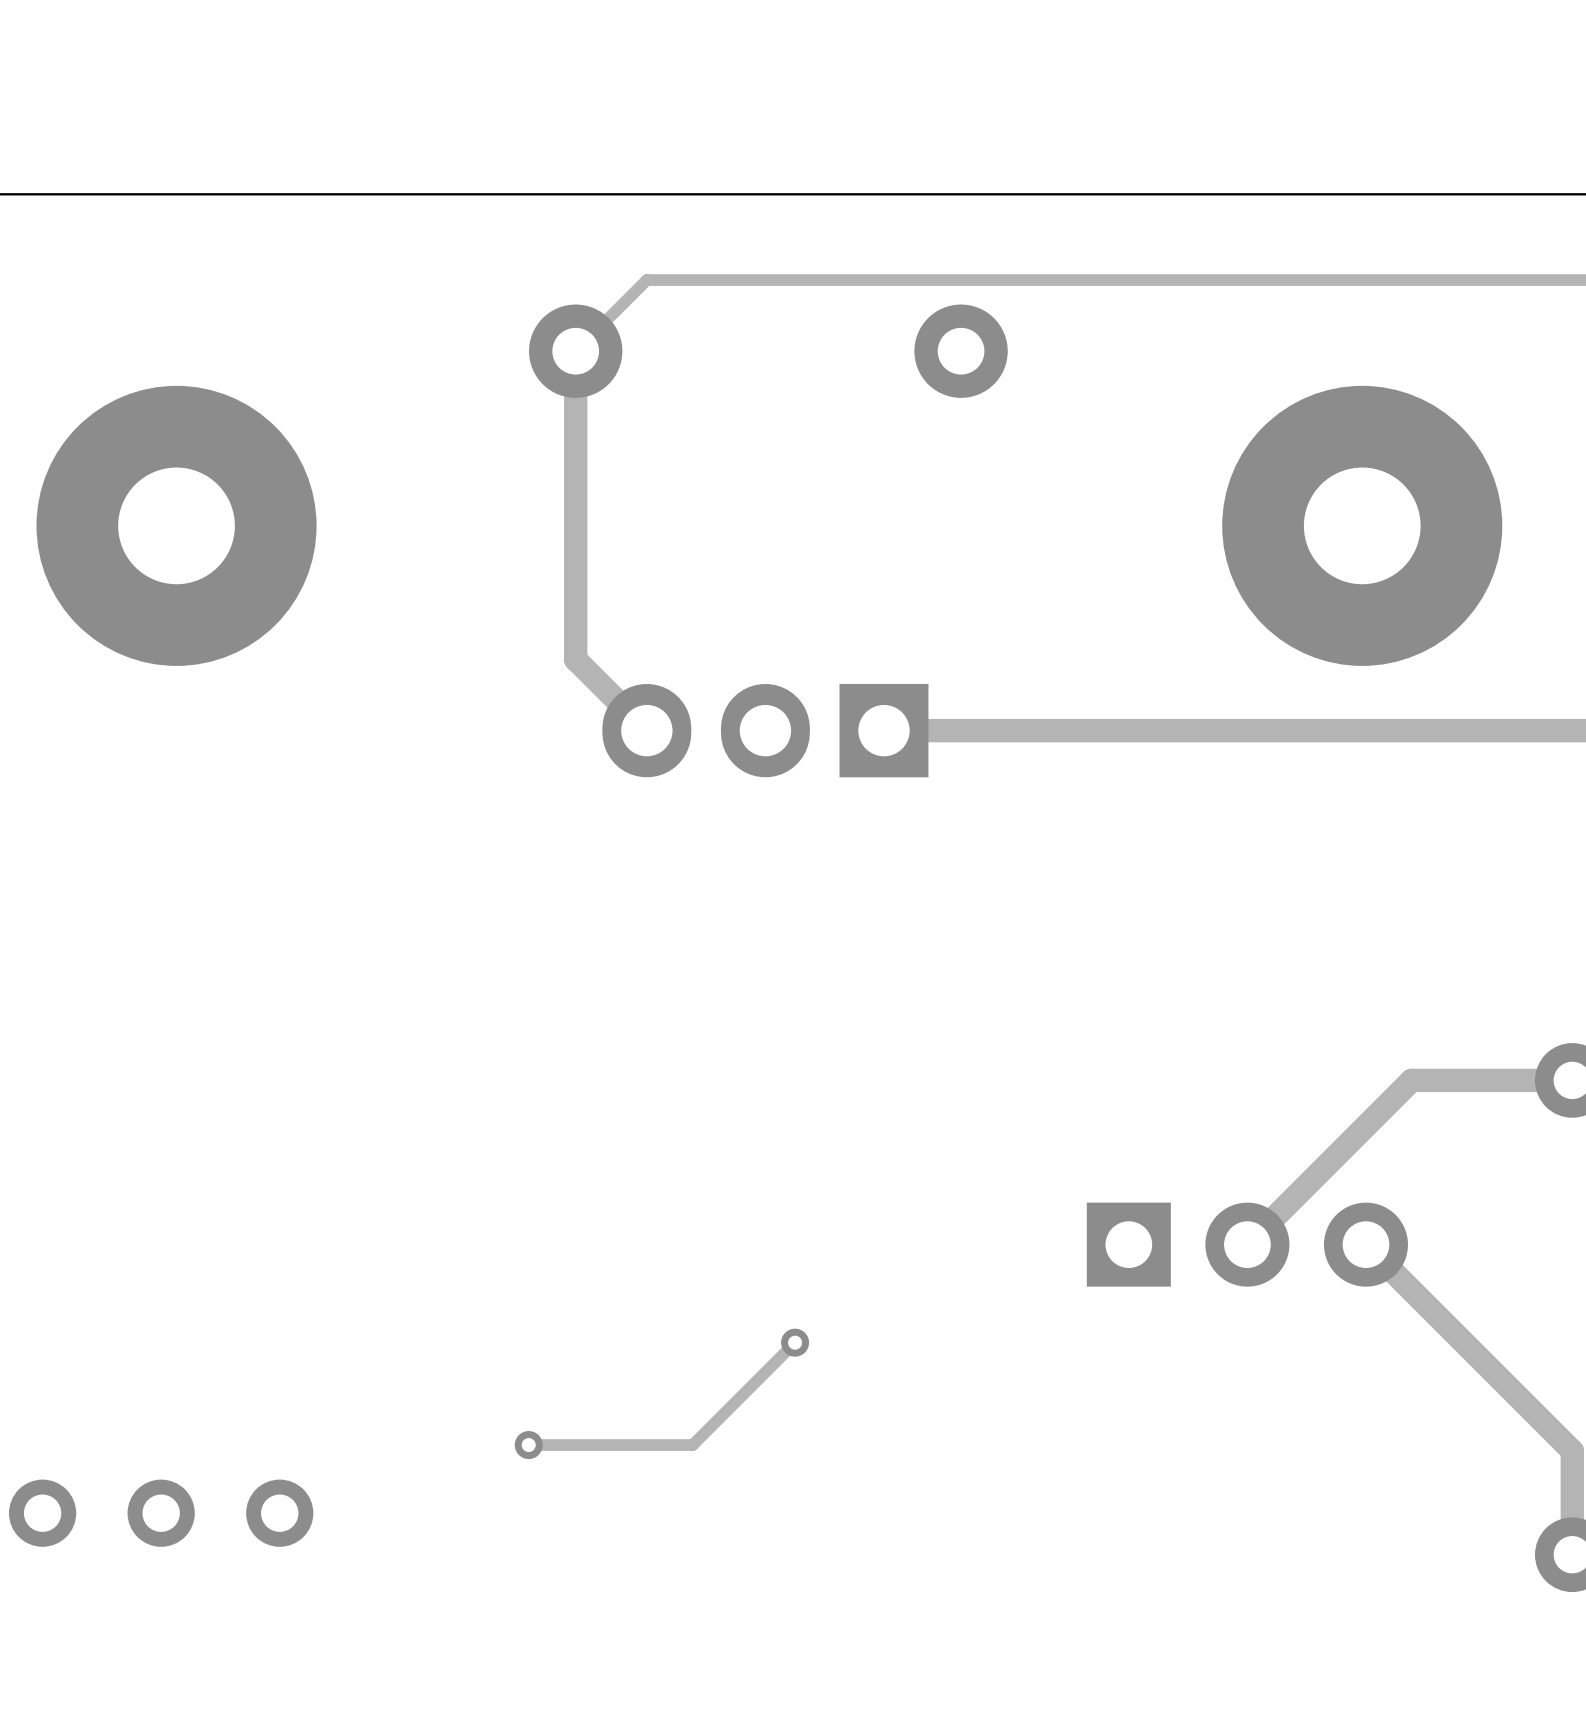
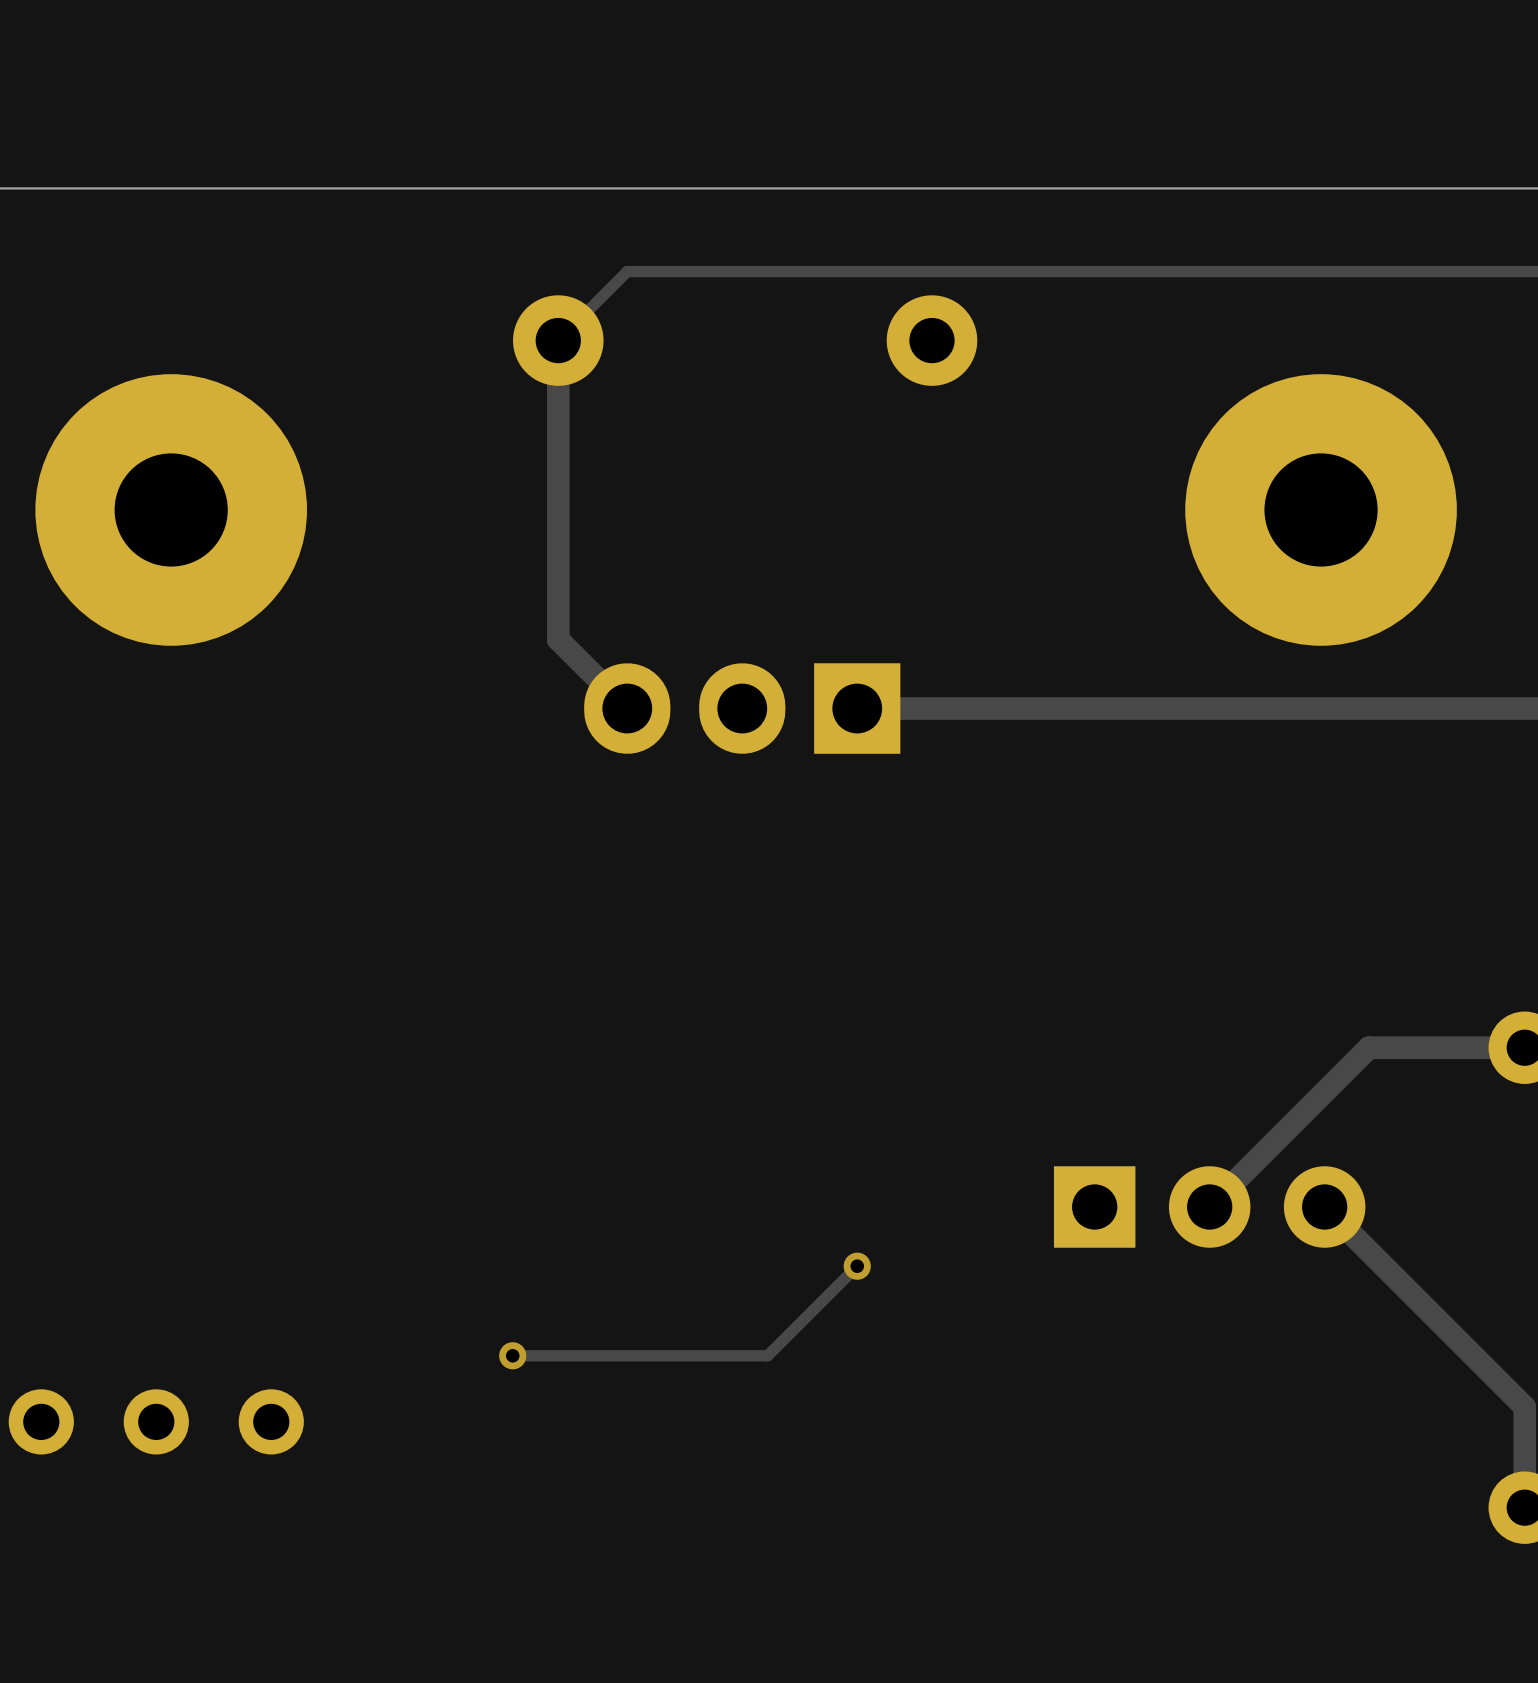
track: none -> (857, 1266) (767, 1355) (512, 1355)
track: (795, 1342) (692, 1445) (528, 1445) -> none
via position: (795, 1342) -> (857, 1266)
via position: (528, 1445) -> (512, 1355)
part position: (161, 1513) -> (156, 1421)

